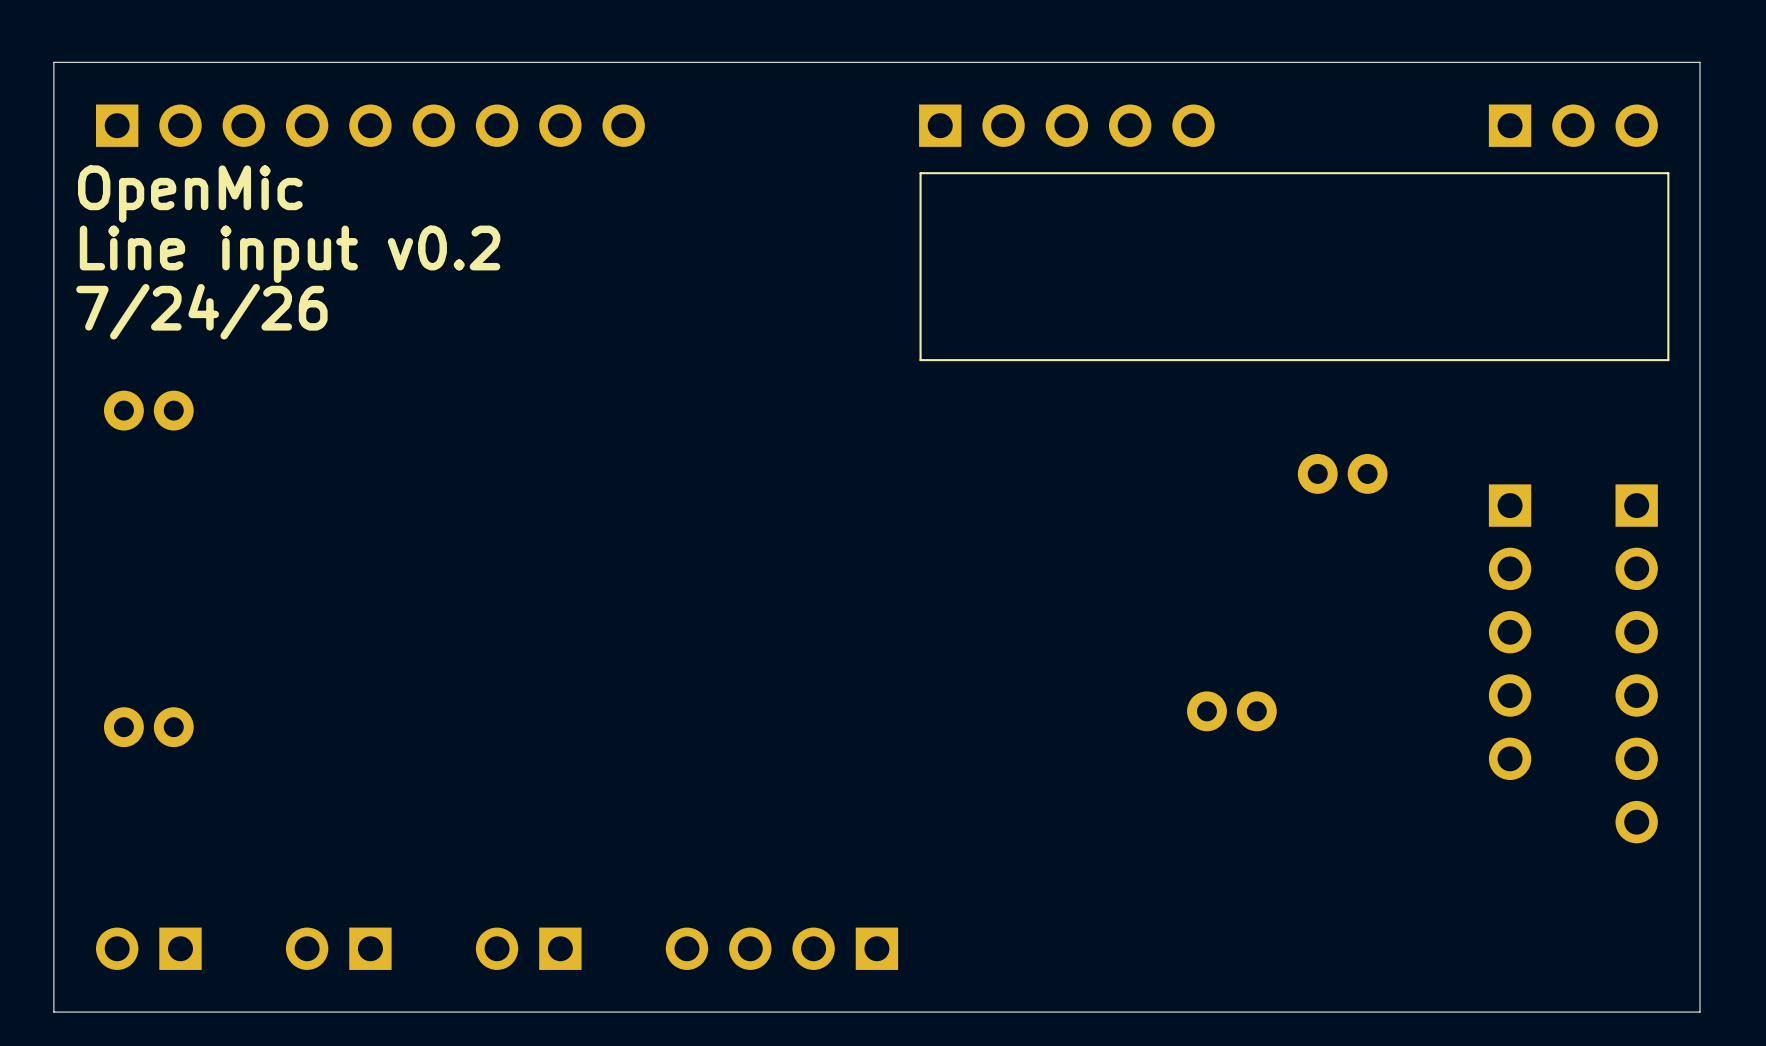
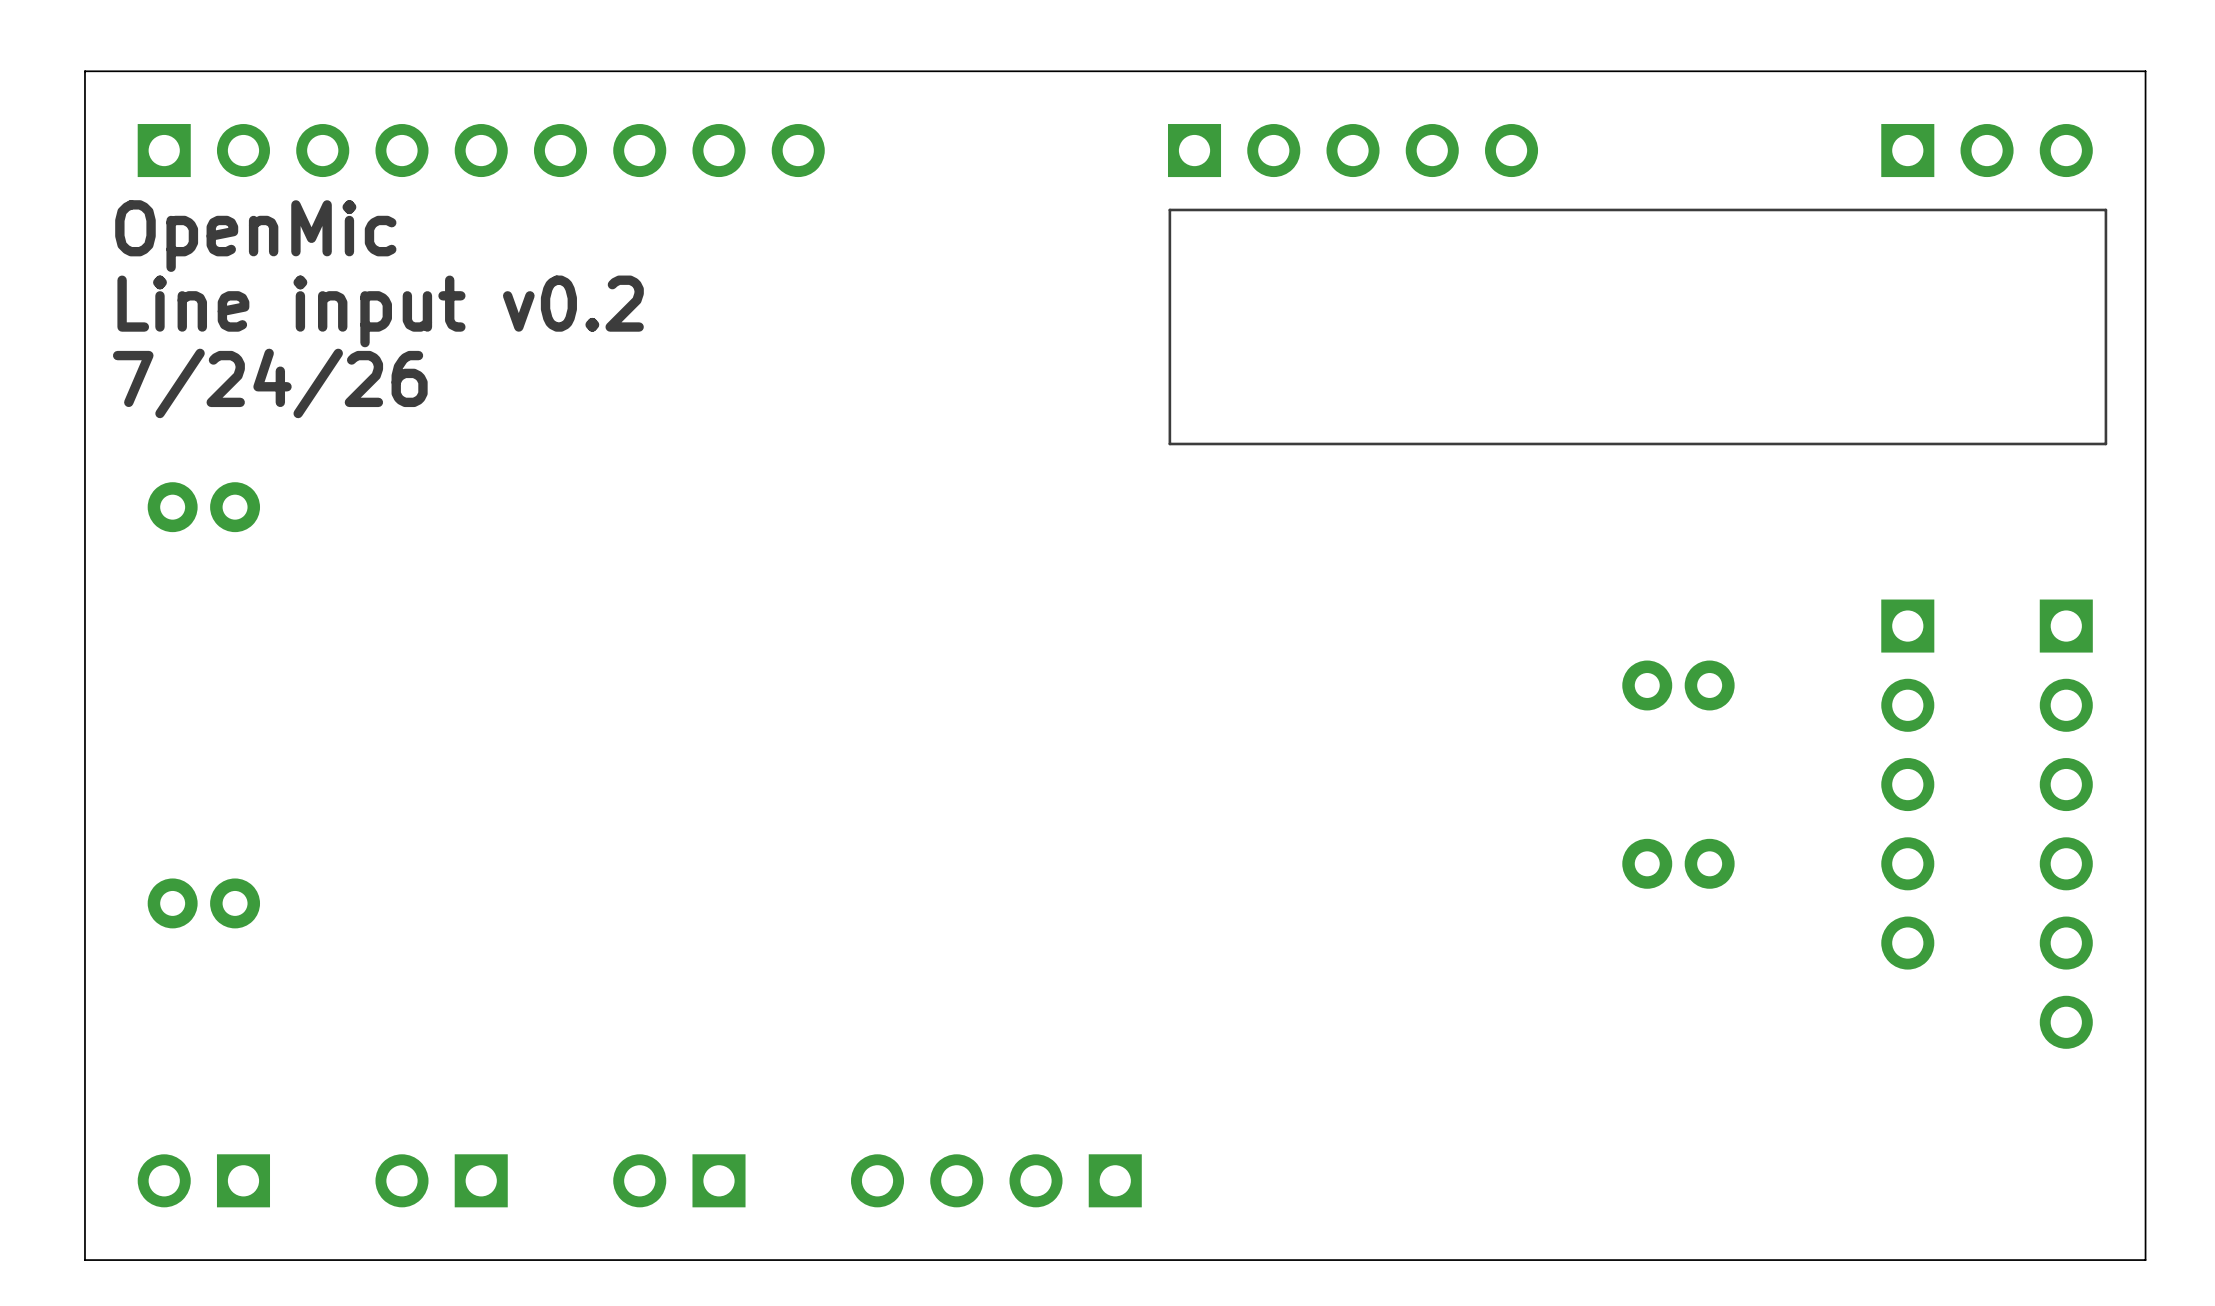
part position: (1342, 473) -> (1678, 685)
part: none -> (1678, 863)
part: (1231, 711) -> none

